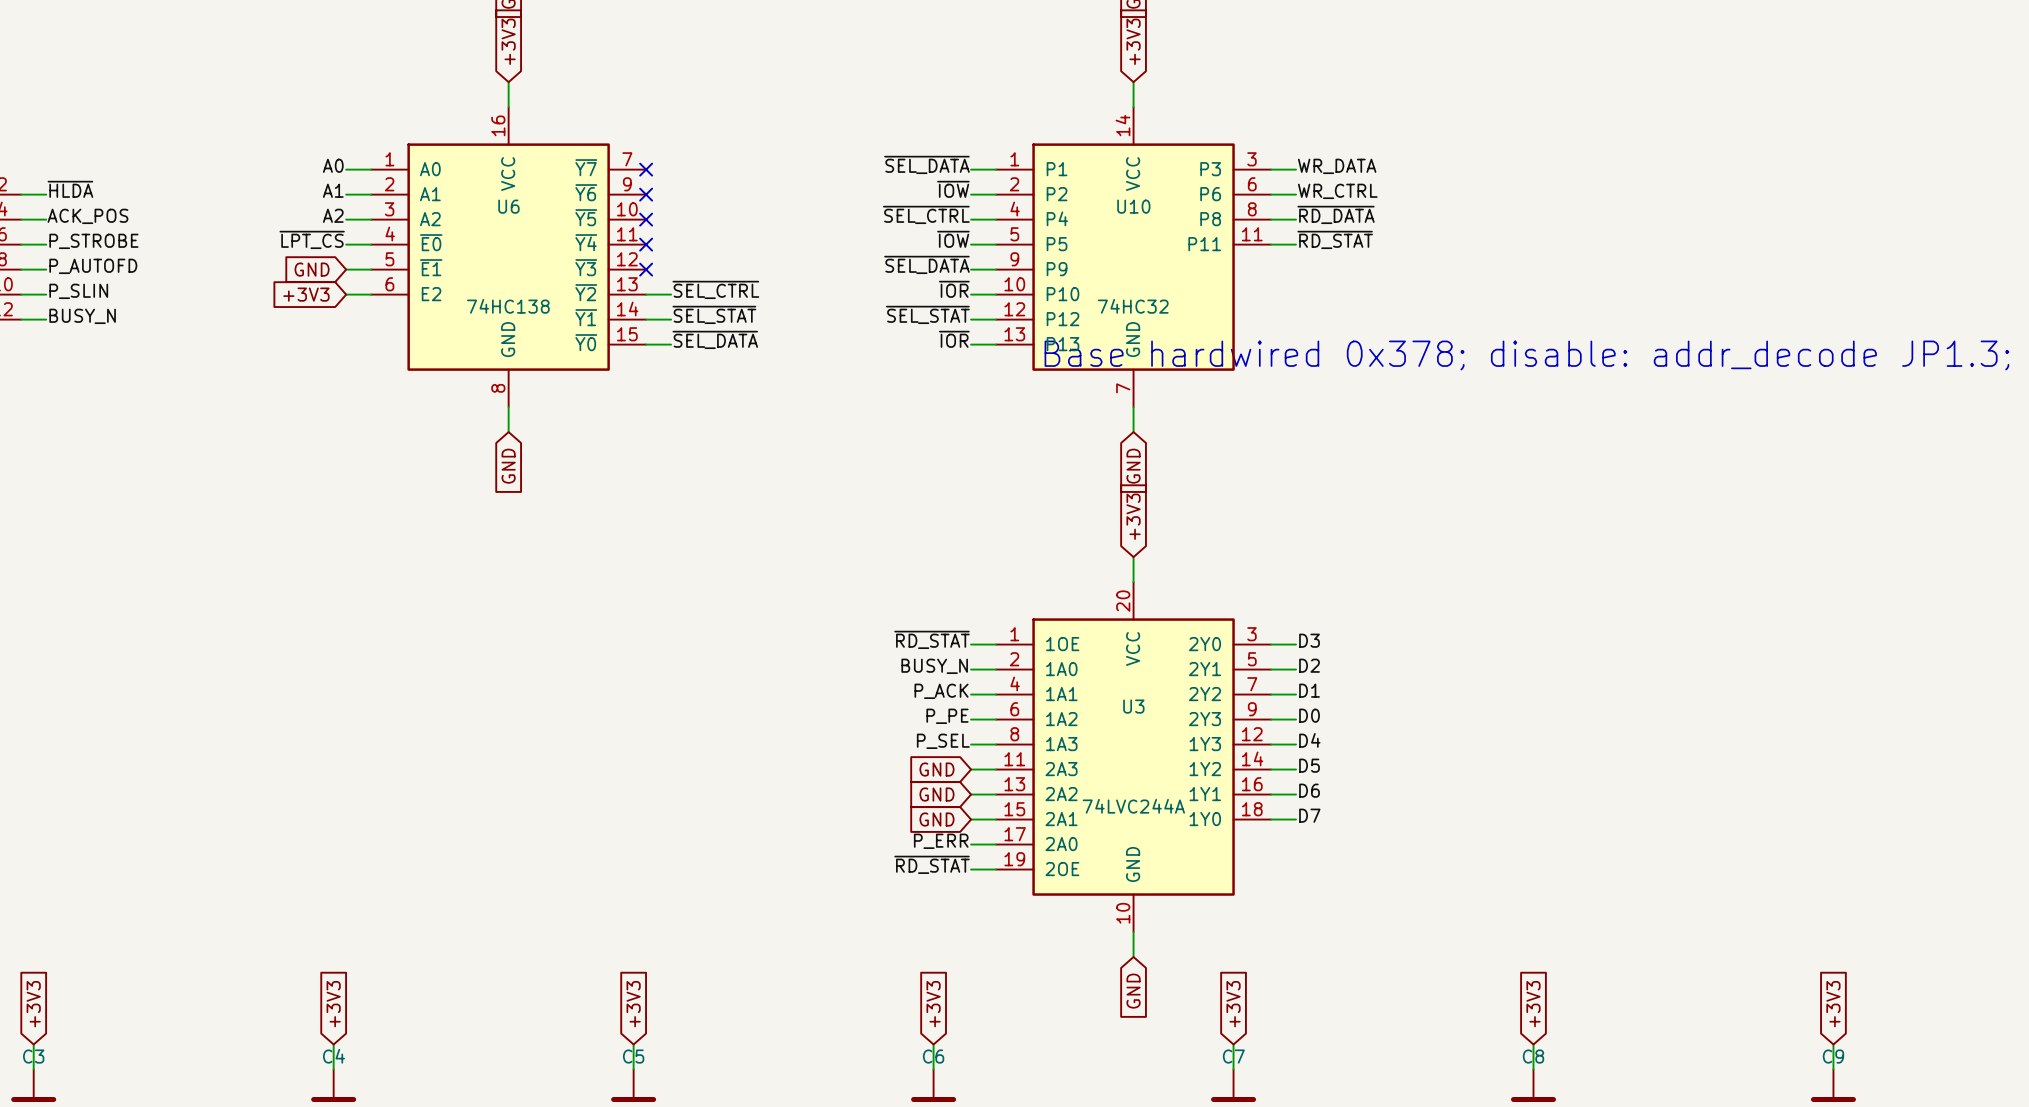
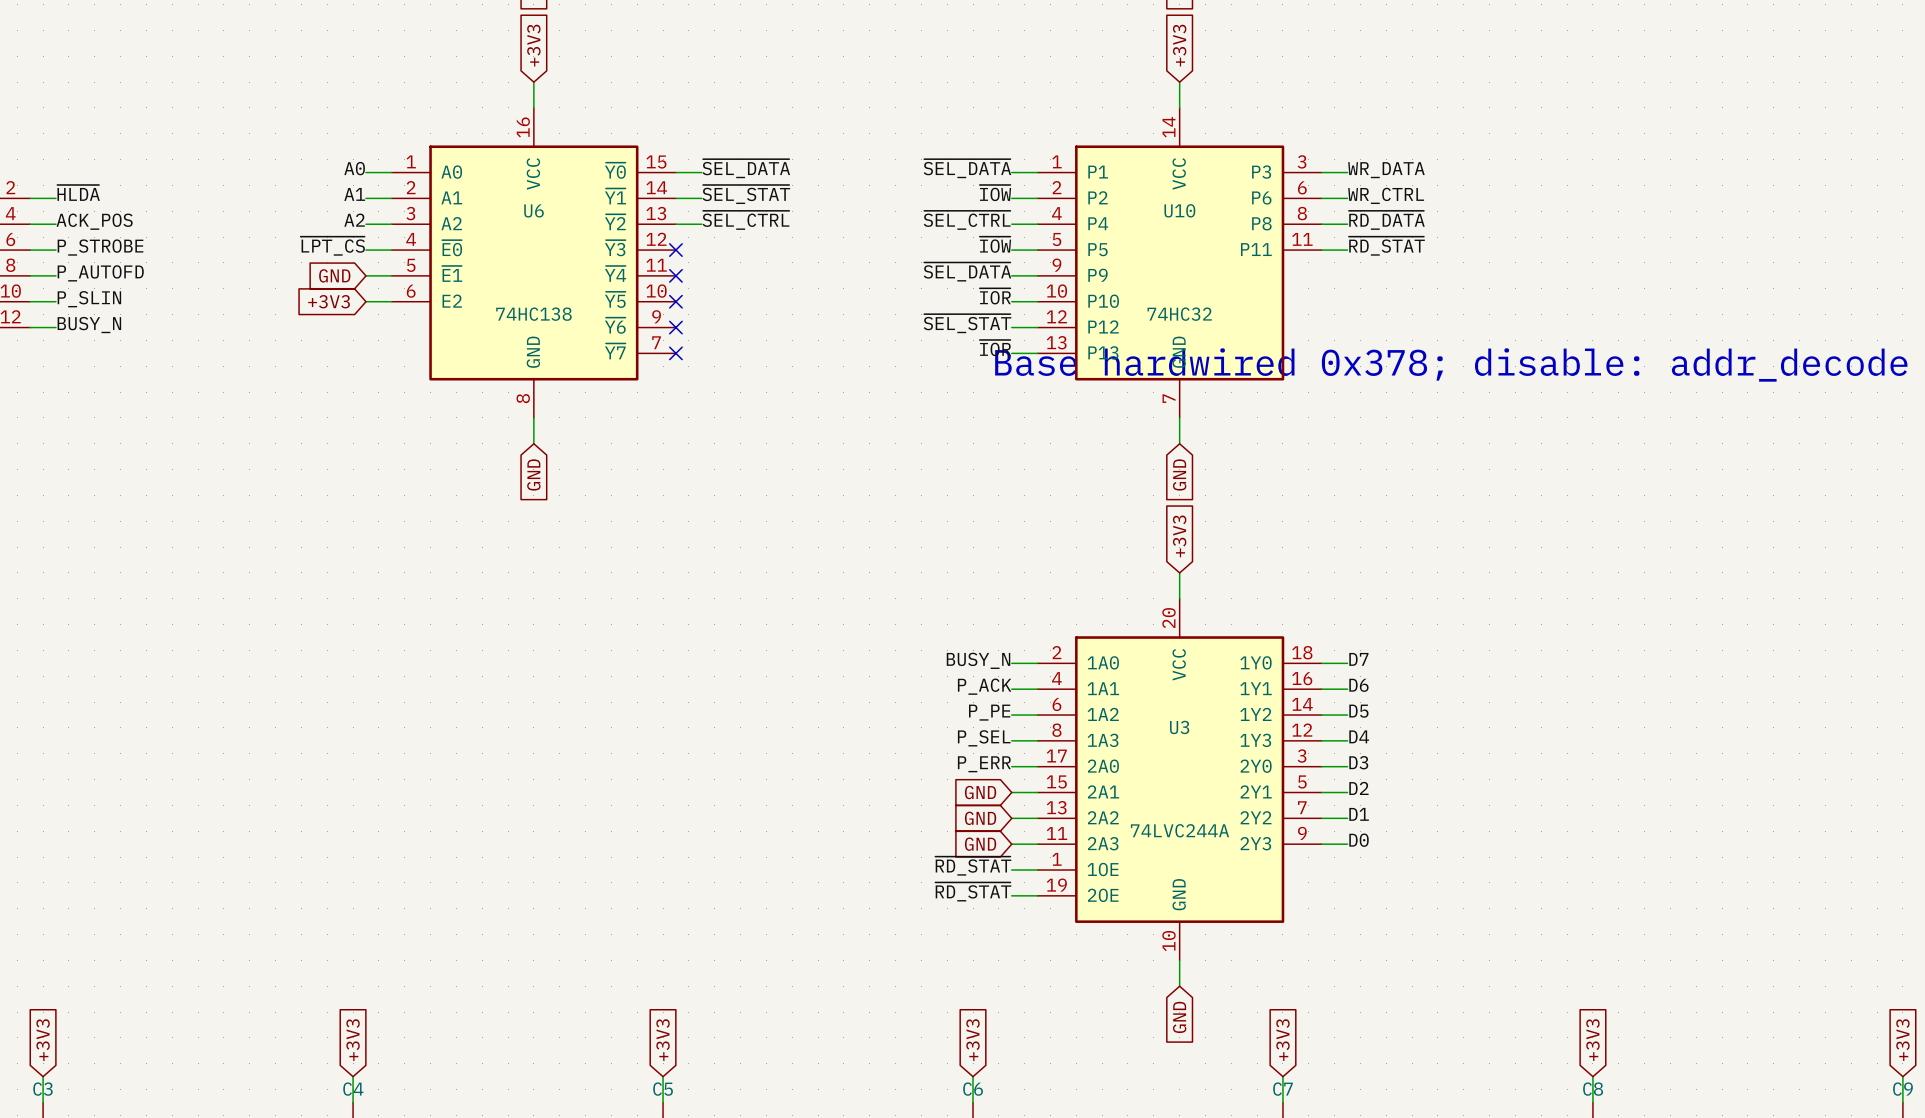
U6 symbol: [371, 107, 647, 408] -> [391, 107, 676, 418]
no-connect mark: (646, 169) -> none
no-connect mark: (646, 194) -> none
no-connect mark: (646, 219) -> none
label position: ~{SEL_CTRL} (715, 289) -> ~{SEL_CTRL} (746, 220)
wire: (646, 294) (671, 294) -> (675, 172) (701, 172)
no-connect mark: none -> (675, 301)
label position: ~{SEL_STAT} (714, 314) -> ~{SEL_STAT} (746, 194)
wire: (646, 319) (671, 319) -> (675, 198) (701, 198)
no-connect mark: none -> (675, 327)
label position: ~{SEL_DATA} (715, 339) -> ~{SEL_DATA} (746, 168)
wire: (646, 344) (671, 344) -> (675, 224) (701, 224)
no-connect mark: none -> (675, 353)
U3 symbol: [996, 582, 1272, 933] -> [1037, 598, 1322, 961]
label: ~{RD_STAT} (932, 639) -> BUSY_N (978, 660)
label: D3 (1309, 640) -> D7 (1358, 659)
label: D2 (1309, 665) -> D6 (1358, 685)
label: BUSY_N (934, 666) -> P_ACK (984, 686)
label: D1 (1309, 690) -> D5 (1358, 711)
label: P_ACK (941, 691) -> P_PE (989, 712)
label: D0 (1309, 715) -> D4 (1359, 736)
label: P_PE (947, 716) -> P_SEL (984, 738)
label: D4 (1309, 740) -> D3 (1358, 762)
label: P_SEL (943, 741) -> P_ERR (984, 764)
label: D5 (1309, 765) -> D2 (1358, 788)
label: D6 (1309, 790) -> D1 (1359, 814)
label: D7 (1309, 815) -> D0 (1359, 840)
label: P_ERR (941, 841) -> ~{RD_STAT} (973, 866)

